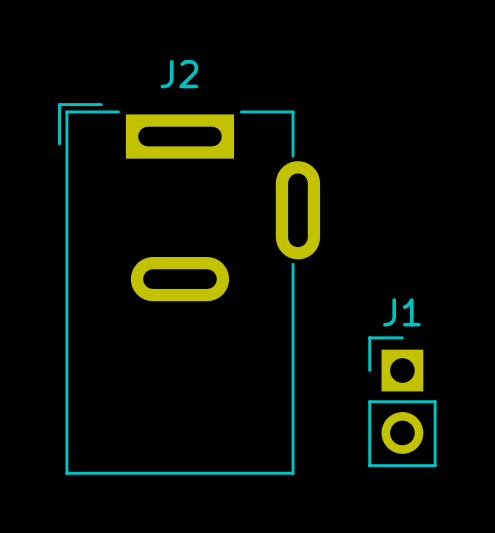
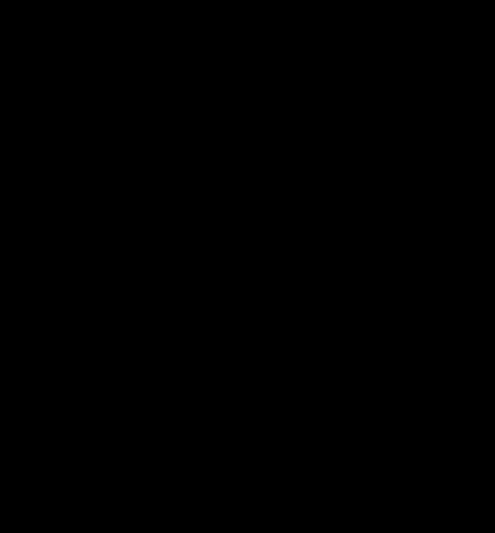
J2: (189, 288) -> none
J1: (402, 401) -> none

